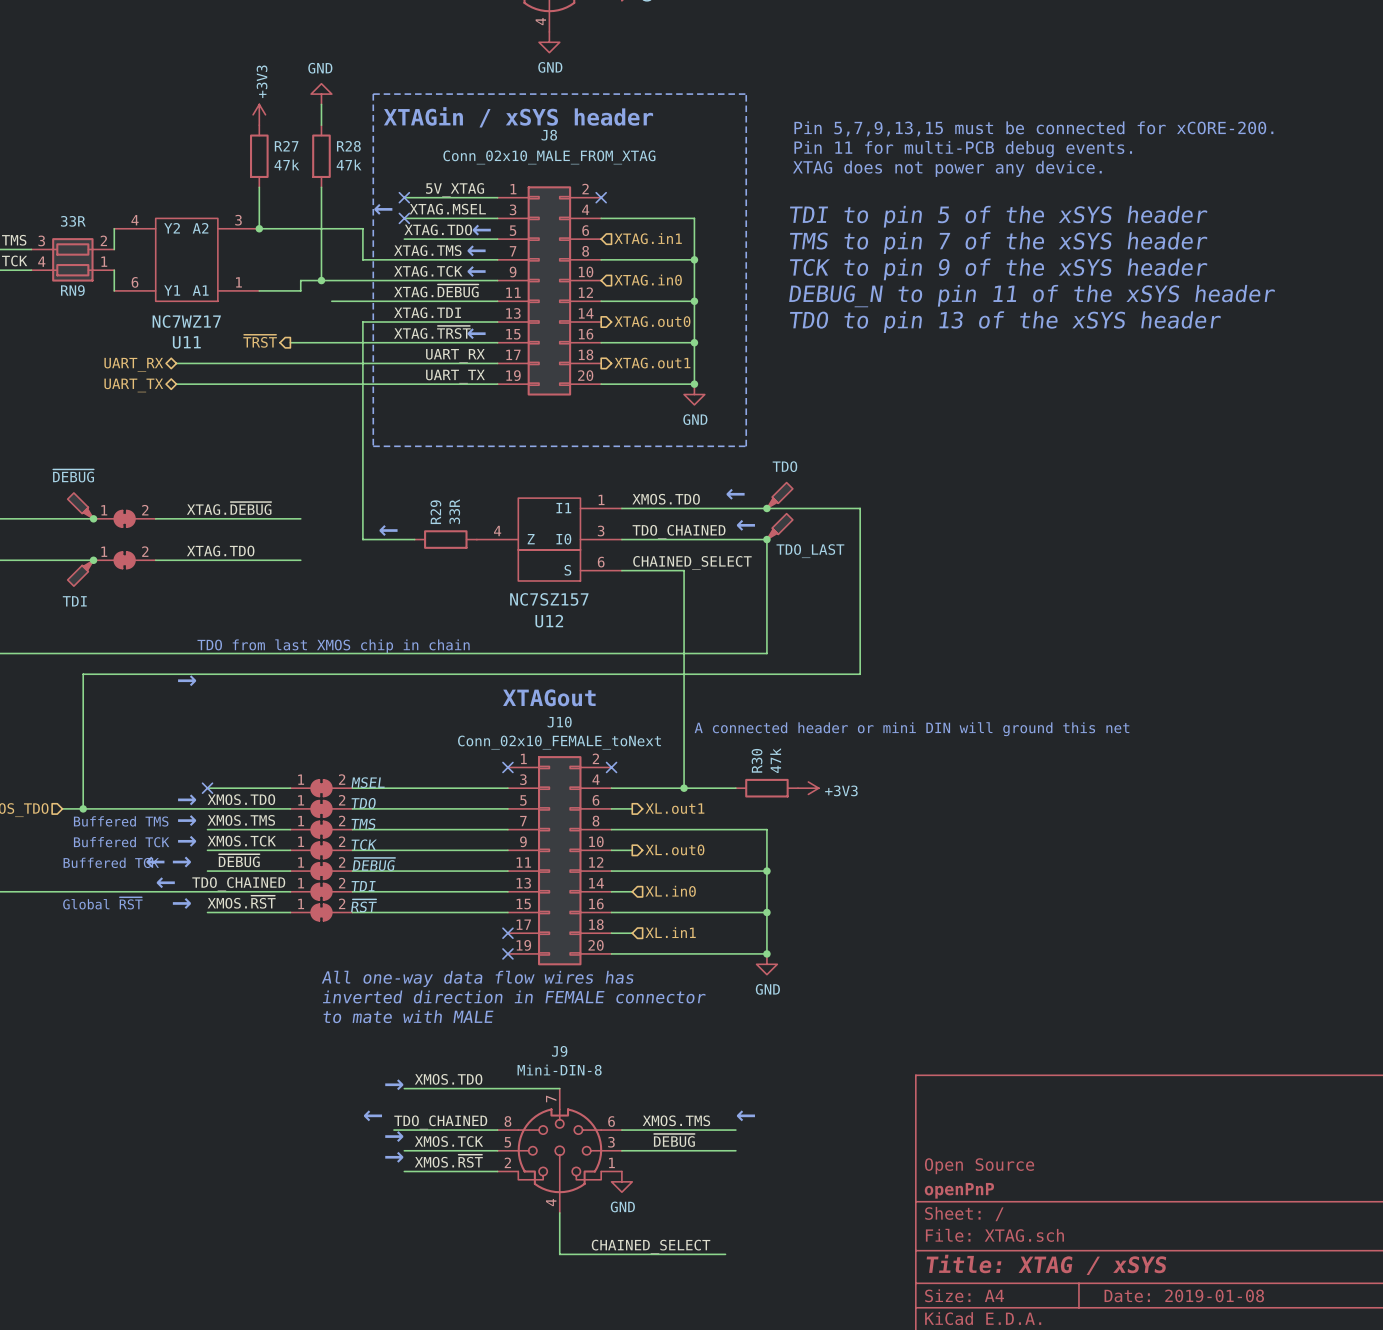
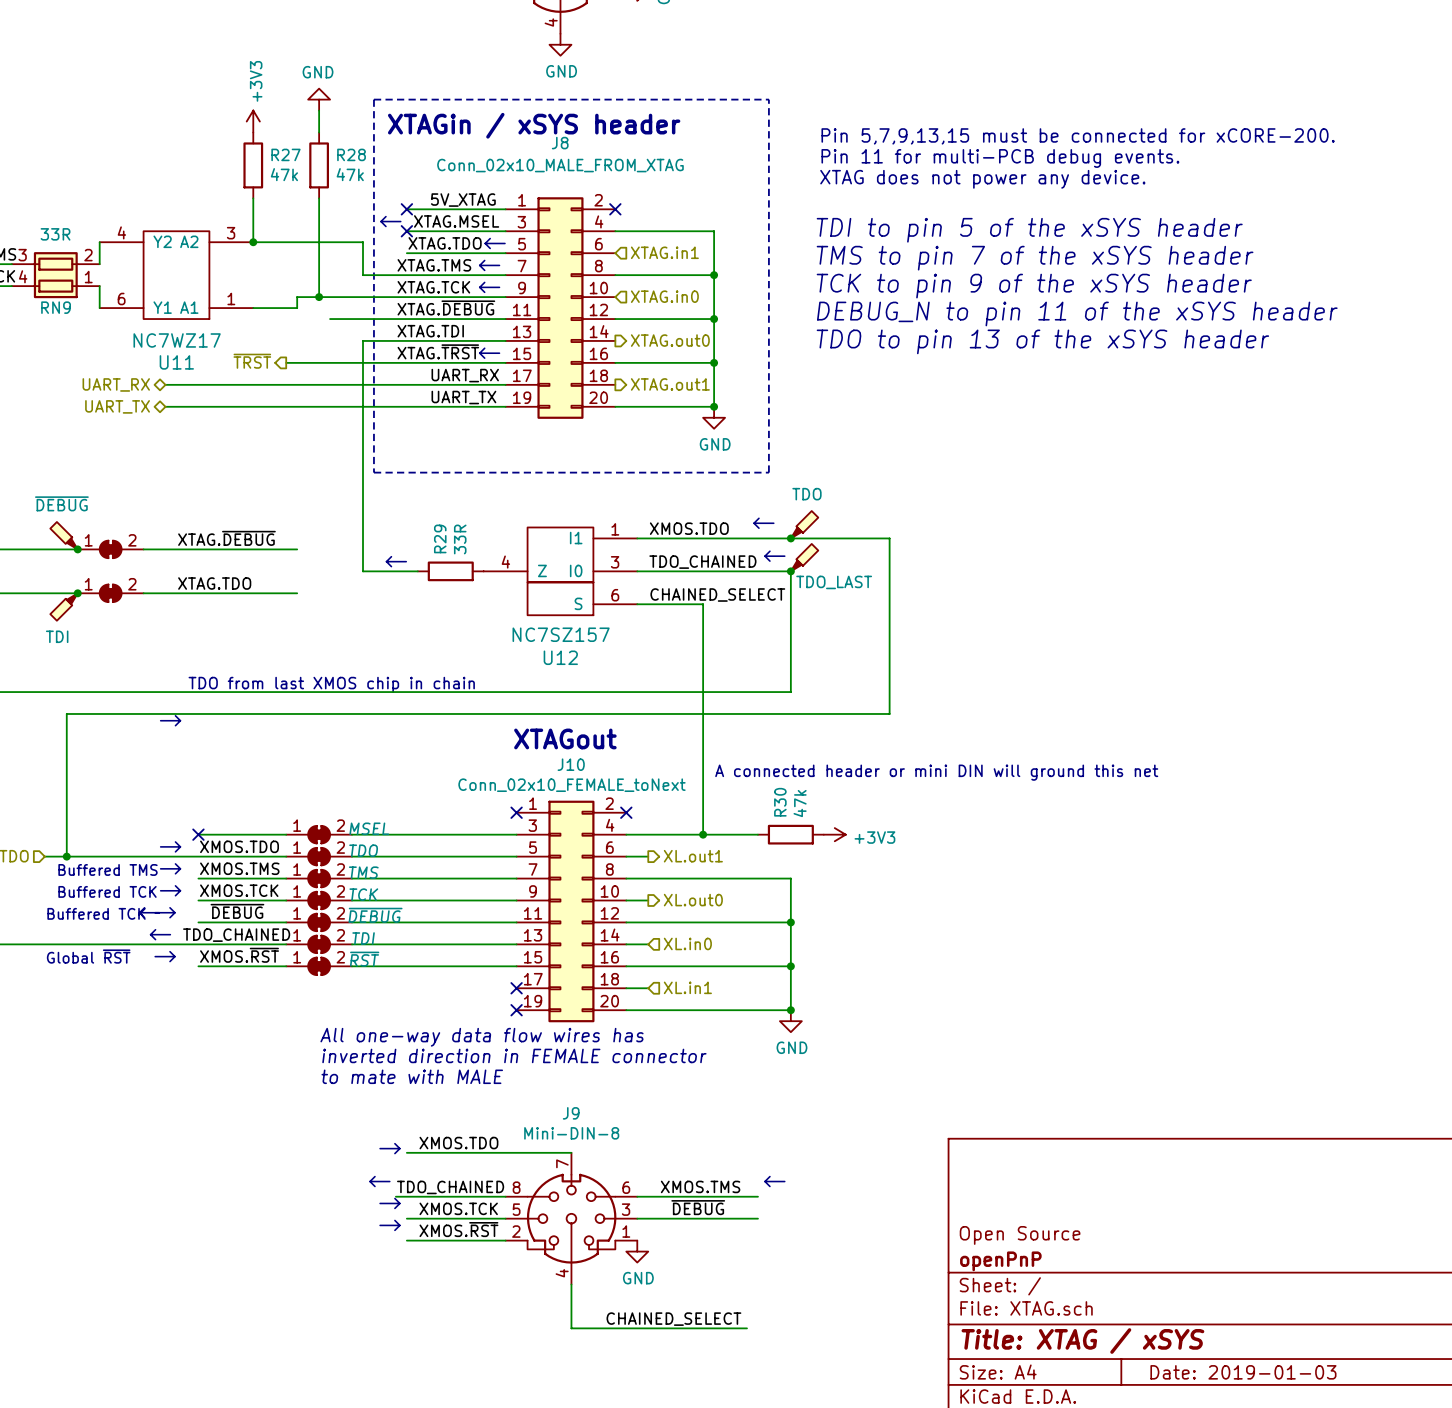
title block: Date: 2019-01-08 (1184, 1295) -> Date: 2019-01-03 (1243, 1372)

